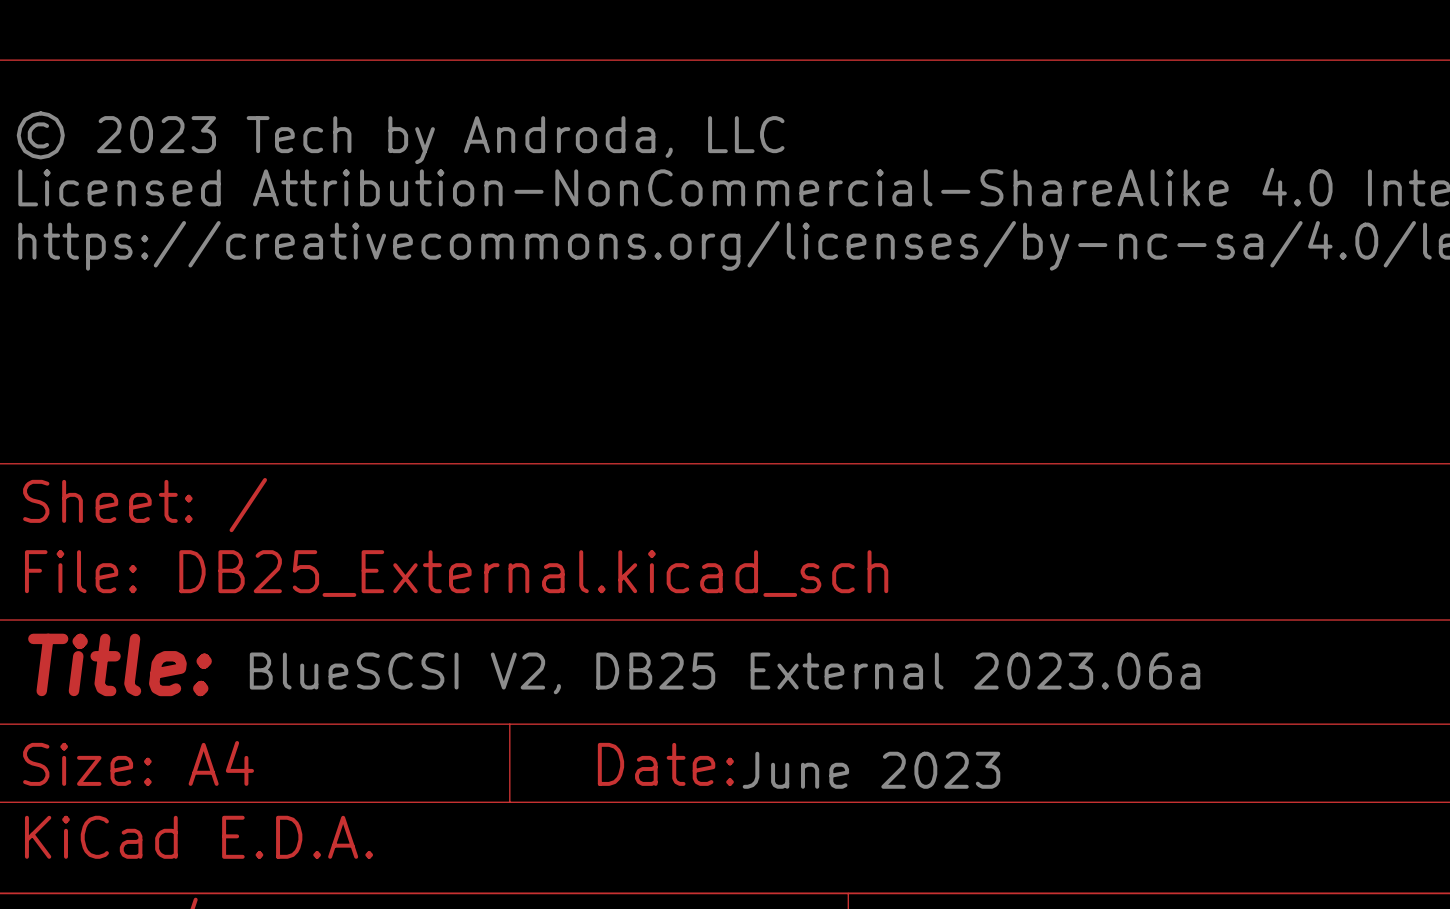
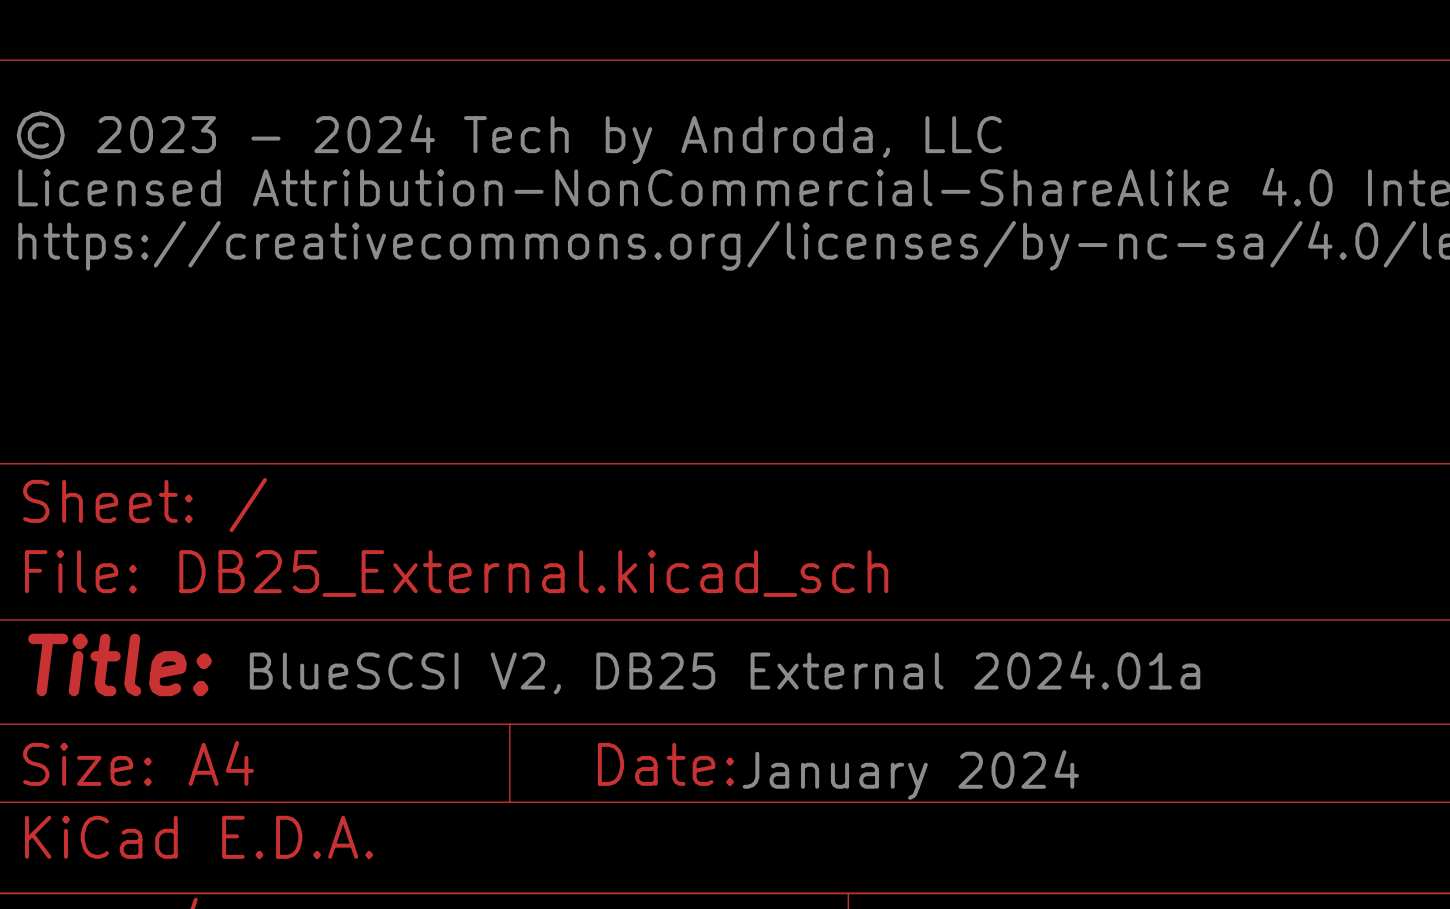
text: © 2023 Tech by Androda, LLC (400, 137) -> © 2023 - 2024 Tech by Androda, LLC (509, 137)
text: BlueSCSI V2, DB25 External 2023.06a (725, 673) -> BlueSCSI V2, DB25 External 2024.01a (725, 672)
text: June 2023 (871, 770) -> January 2024 (910, 774)

